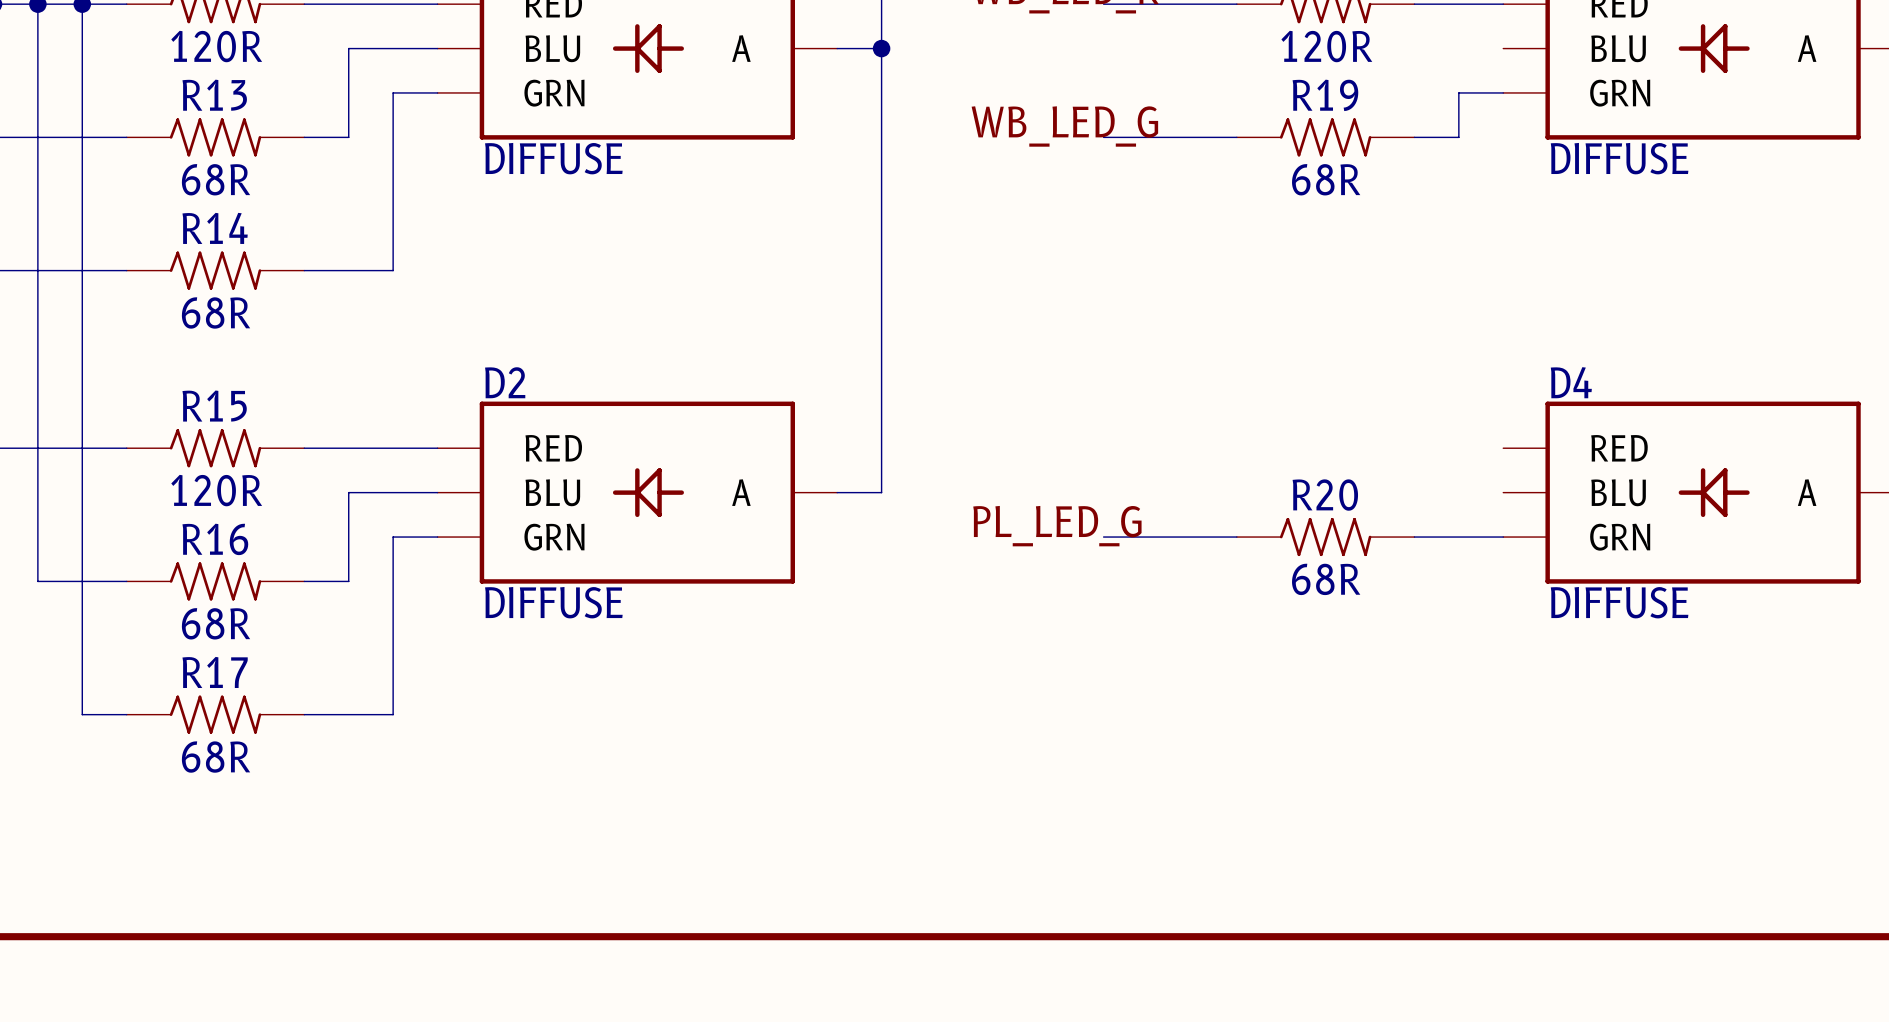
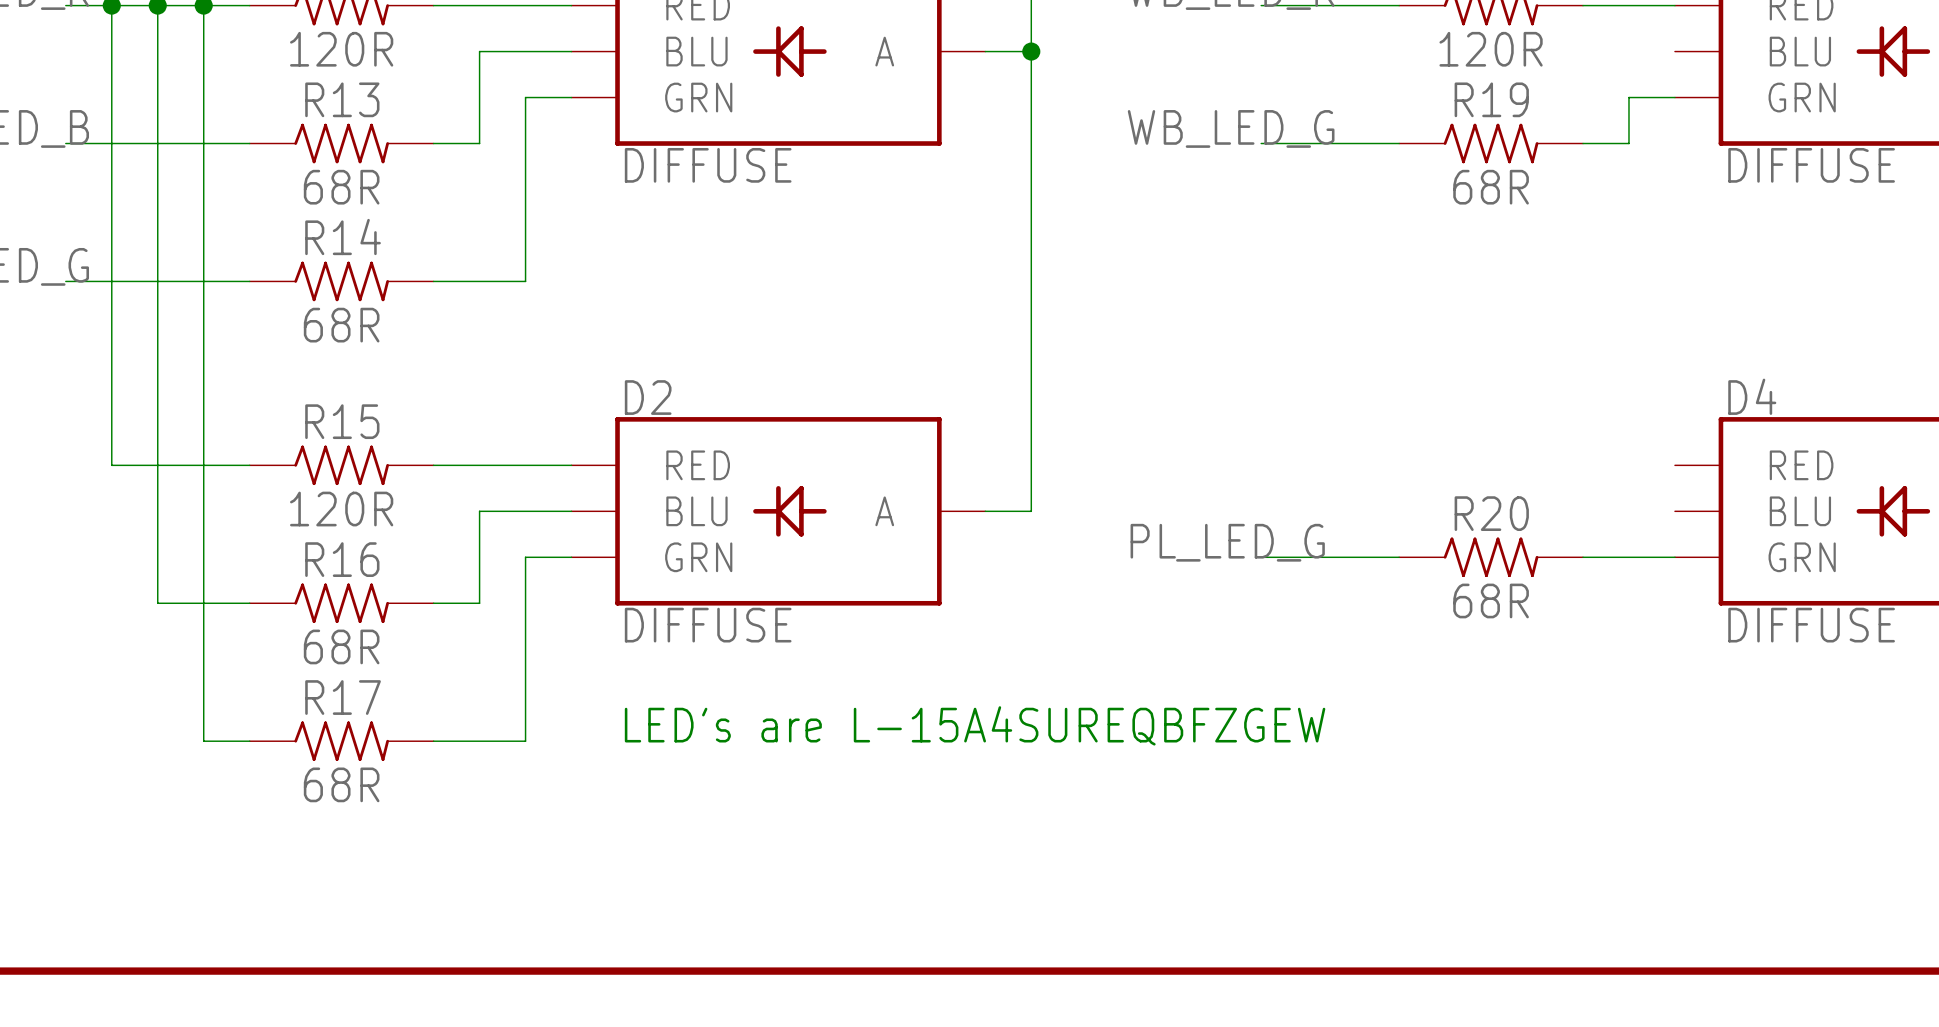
text: none -> LED's are L-15A4SUREQBFZGEW (975, 725)

